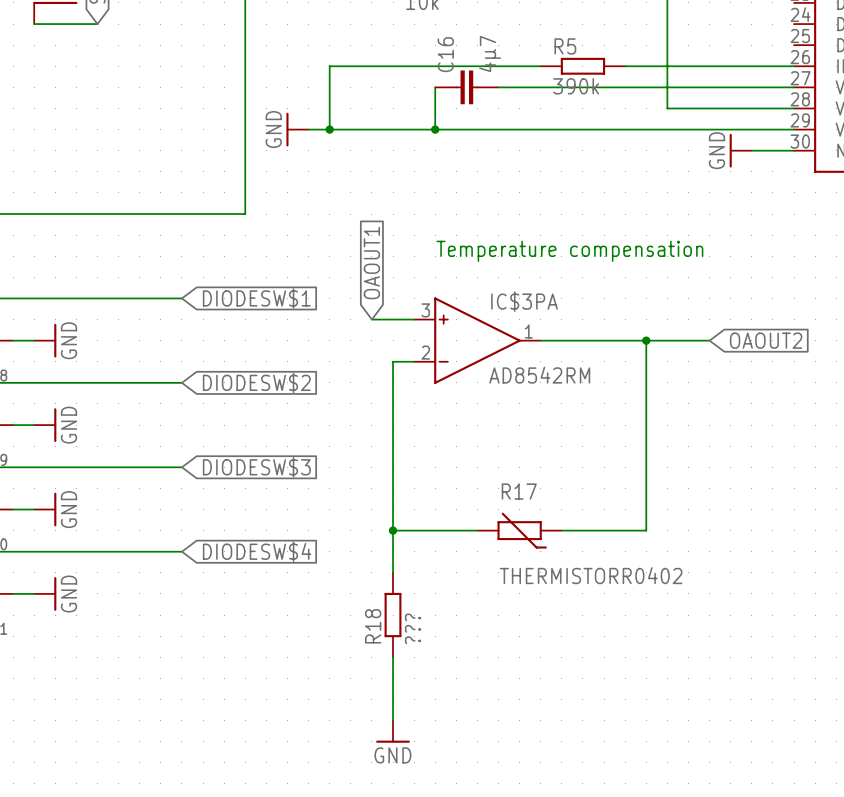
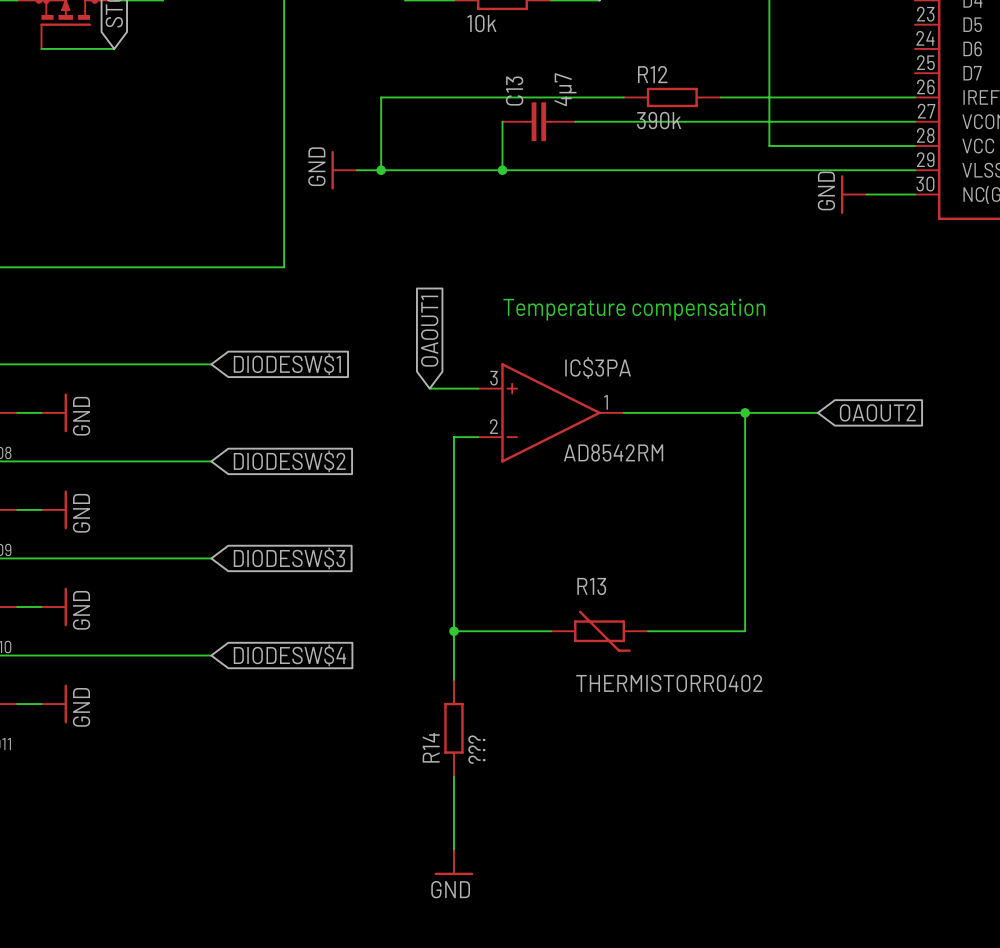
R5 name: R5 (565, 46) -> R12 (652, 74)
C16 name: C16 (445, 54) -> C13 (514, 91)
R17 name: R17 (519, 491) -> R13 (591, 586)
R18 name: R18 (373, 626) -> R14 (431, 747)

